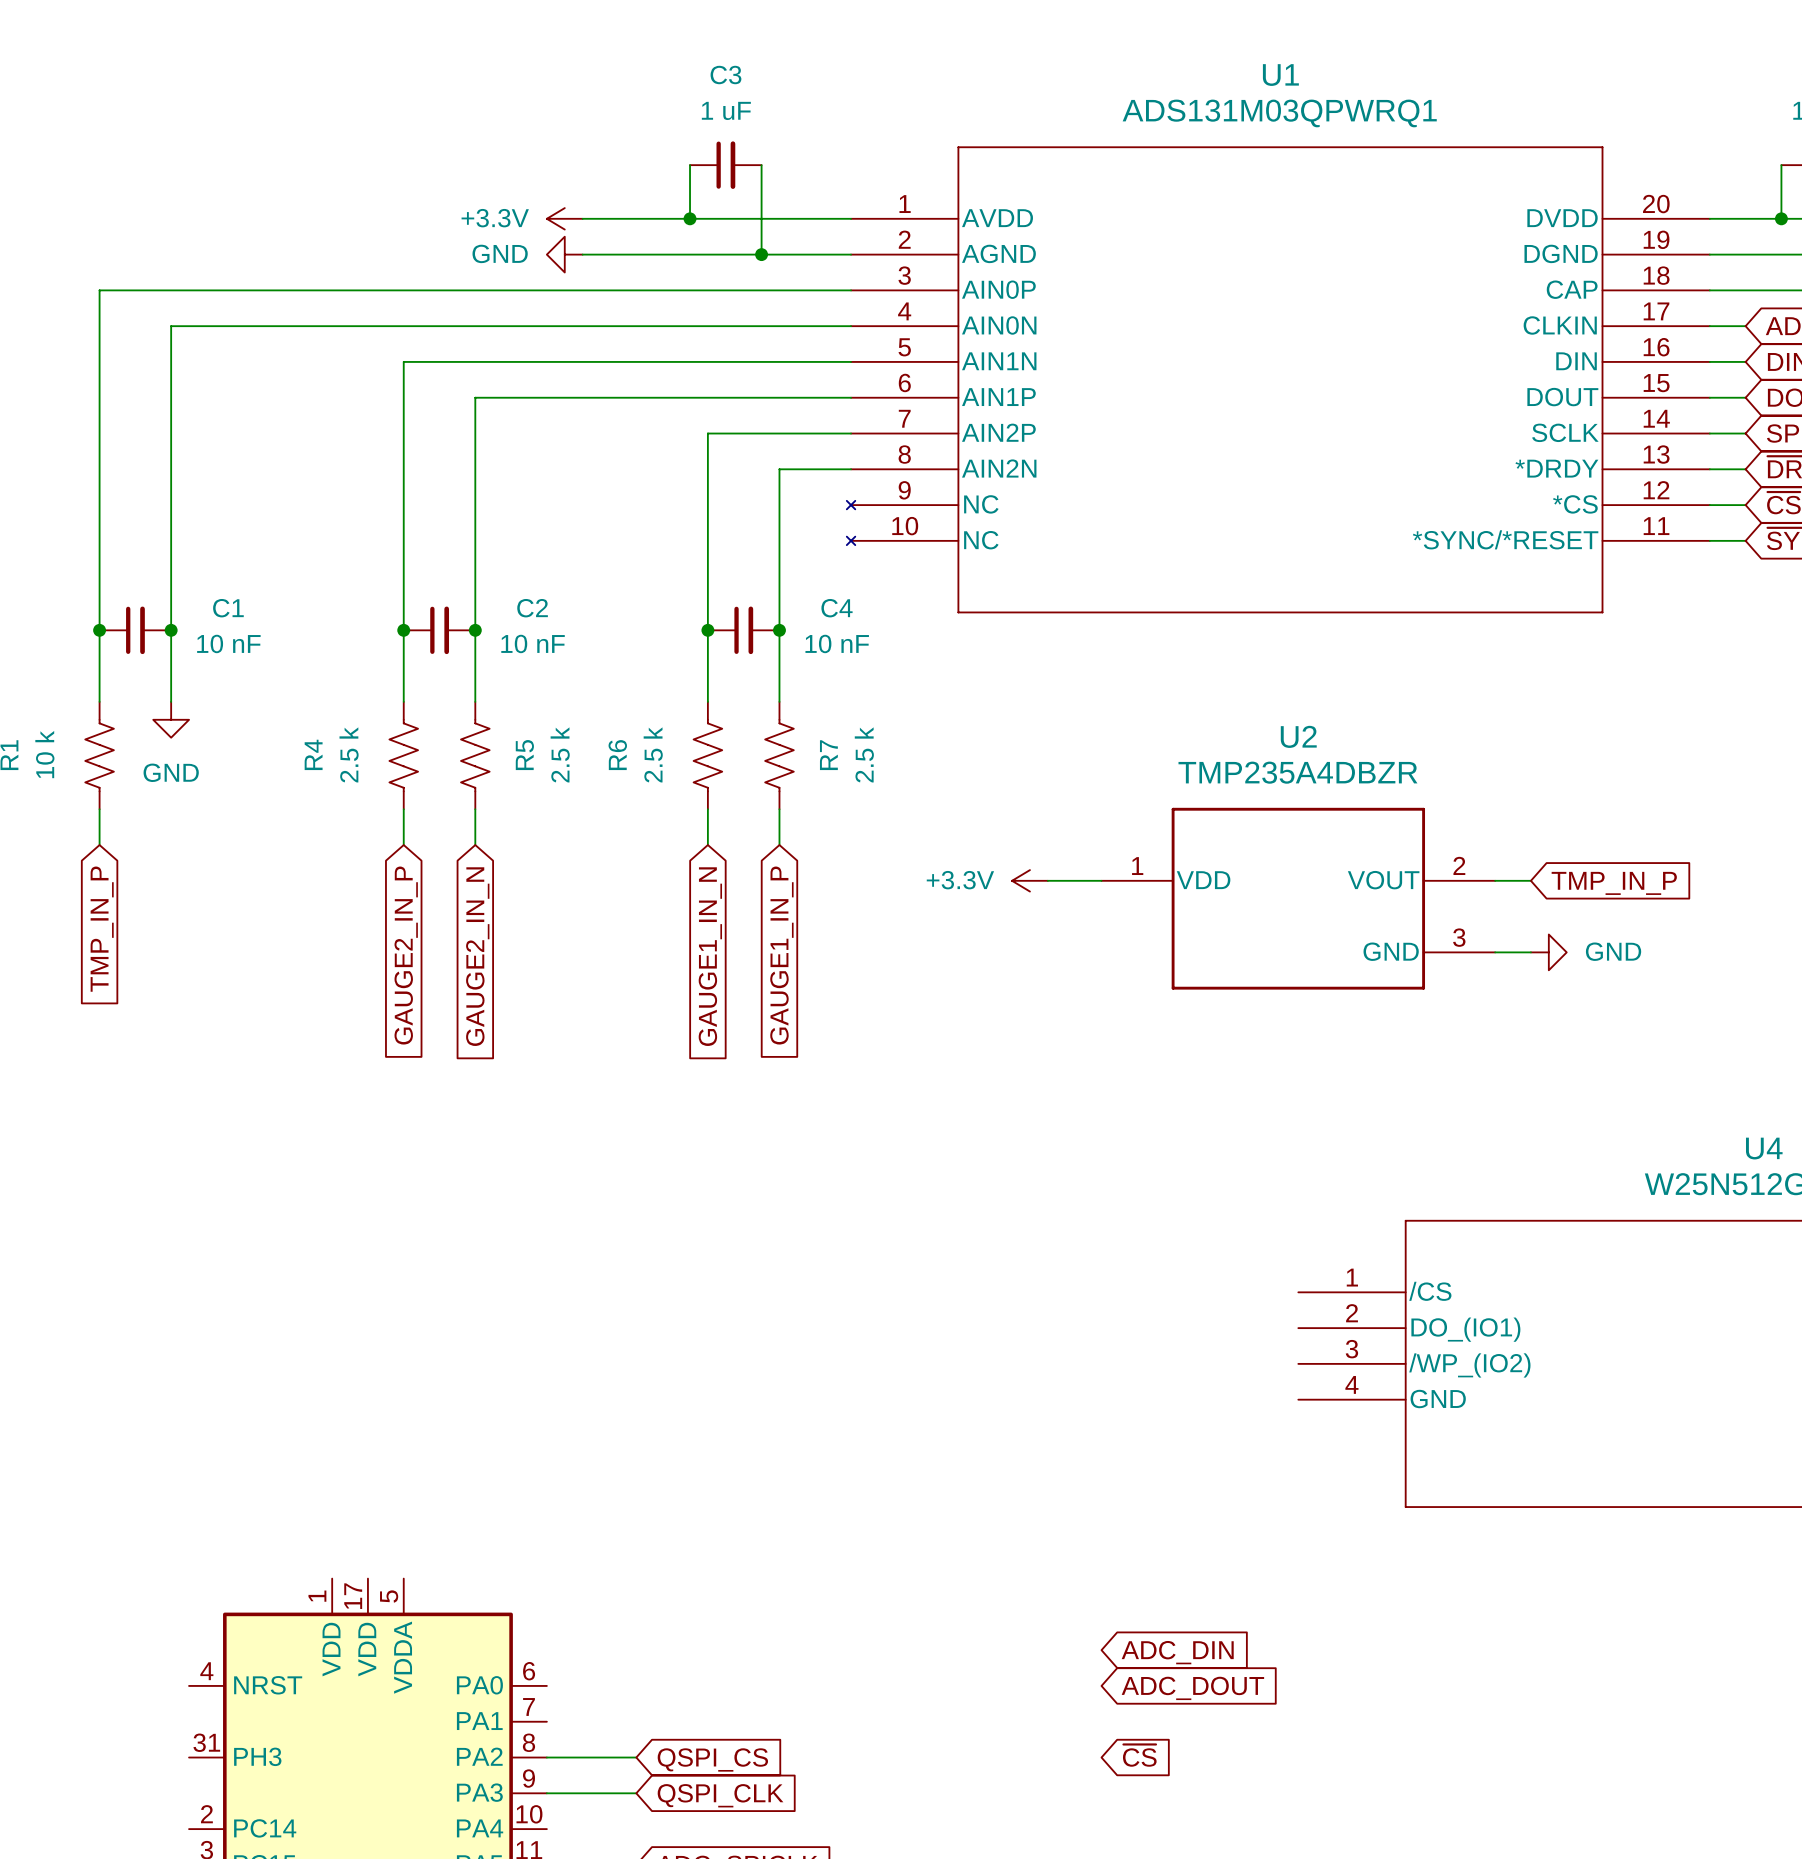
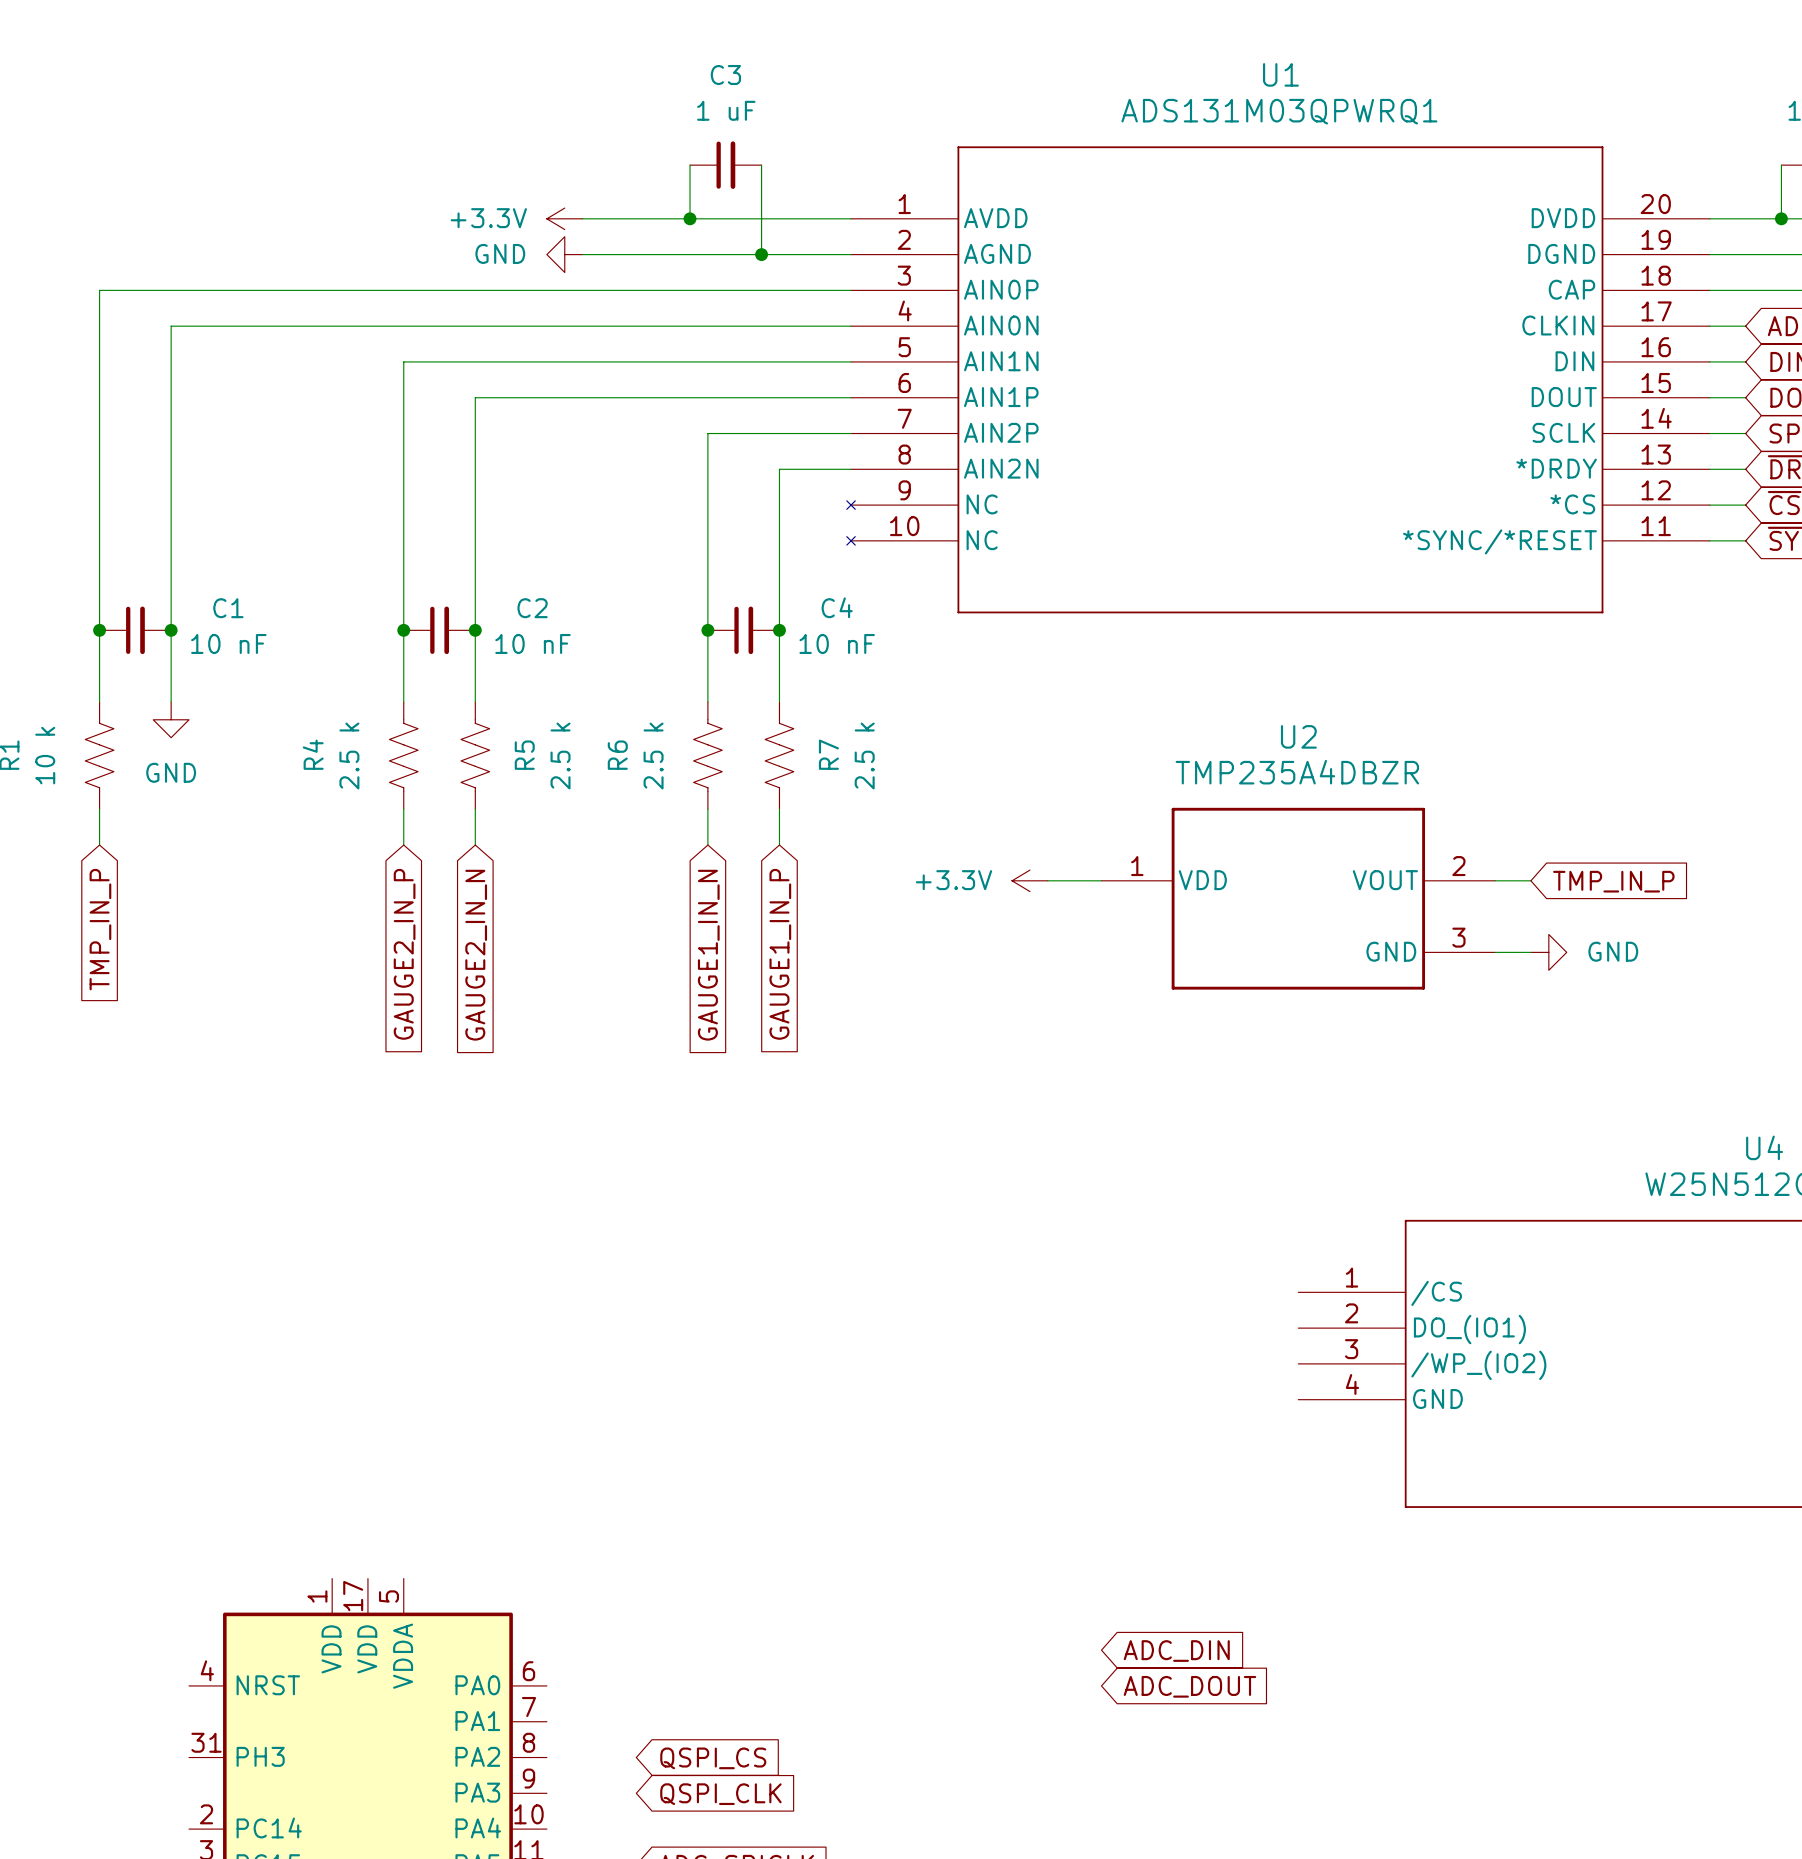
global label: ~{CS} (1139, 1755) -> none
wire: (546, 1757) (636, 1757) -> none
wire: (546, 1793) (636, 1793) -> none

